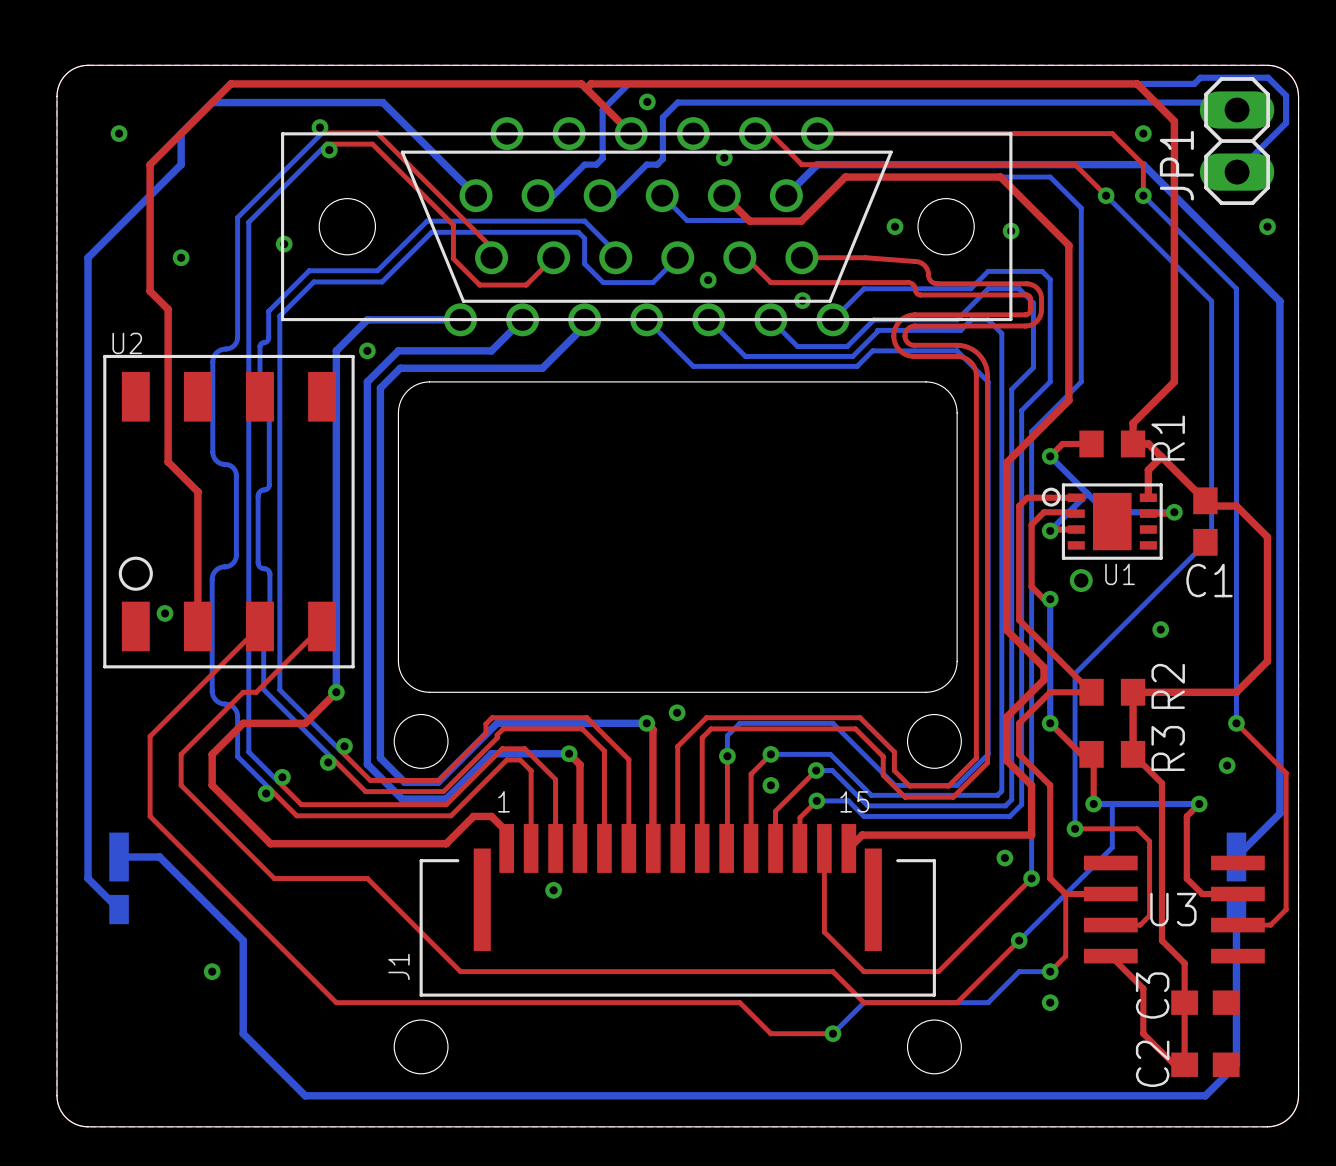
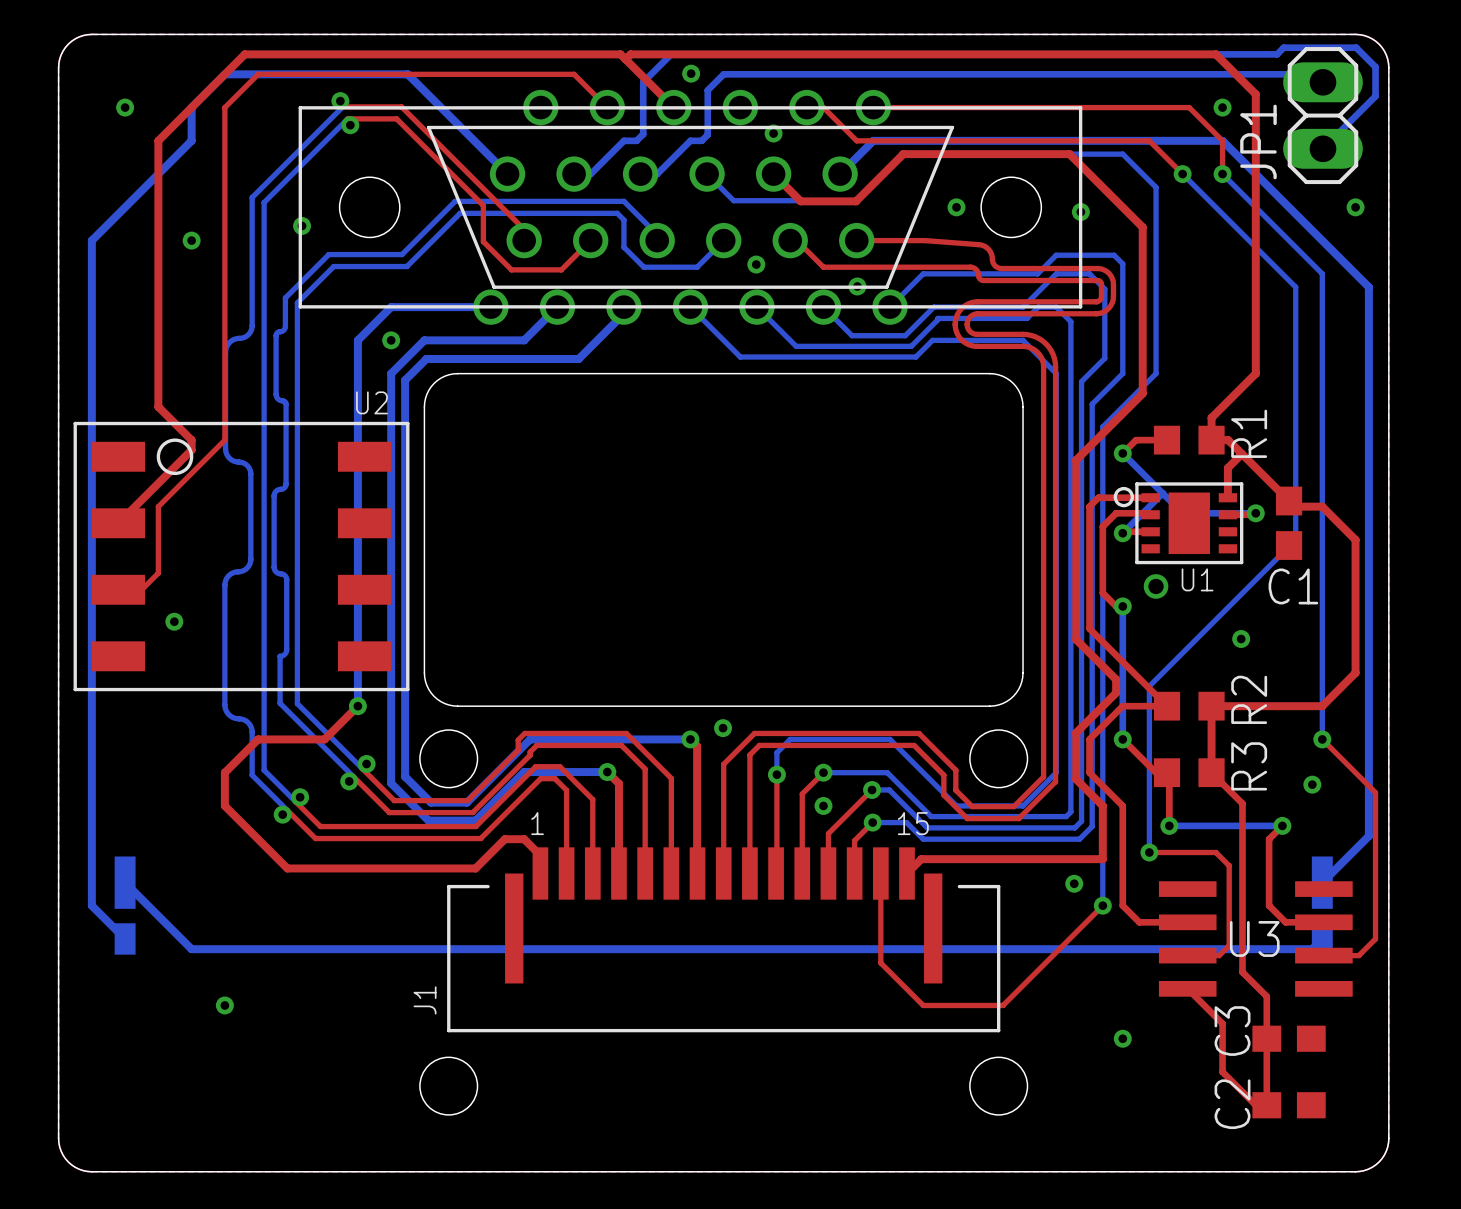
top track: none -> (607, 107) (574, 74) (258, 74) (224, 107) (224, 440) (158, 506) (158, 573) (141, 589) (118, 589)
top track: (150, 291) (168, 309) (168, 461) (197, 491) (197, 626) -> (158, 276) (158, 406) (191, 440) (191, 450) (118, 523)
U2 name position: U2 (127, 343) -> U2 (371, 402)
U2 rotation: 0° (228, 511) -> 90° clockwise (241, 556)
top track: (259, 626) (150, 736) (150, 816) (336, 1002) (739, 1002) (770, 1033) (832, 1033) -> none
top track: (322, 626) (256, 692) (243, 692) (181, 754) (181, 785) (274, 878) (367, 878) (460, 971) (832, 971) (864, 1002) (957, 1002) (1019, 940) -> none
bottom track: (1112, 804) (1112, 847) (1019, 940) -> none
bottom track: (119, 857) (159, 857) (243, 940) (243, 1033) (305, 1095) (1205, 1095) (1236, 1064) (1236, 909) -> (125, 882) (191, 949) (1312, 949) (1322, 938)
via: (553, 890) -> none
top track: (1065, 894) (1065, 956) (1050, 971) -> none
via: (1019, 940) -> none
bottom track: (1050, 971) (1019, 971) (988, 1002) (864, 1002) (832, 1033) -> none
via: (1050, 971) -> none
via: (832, 1033) -> none

